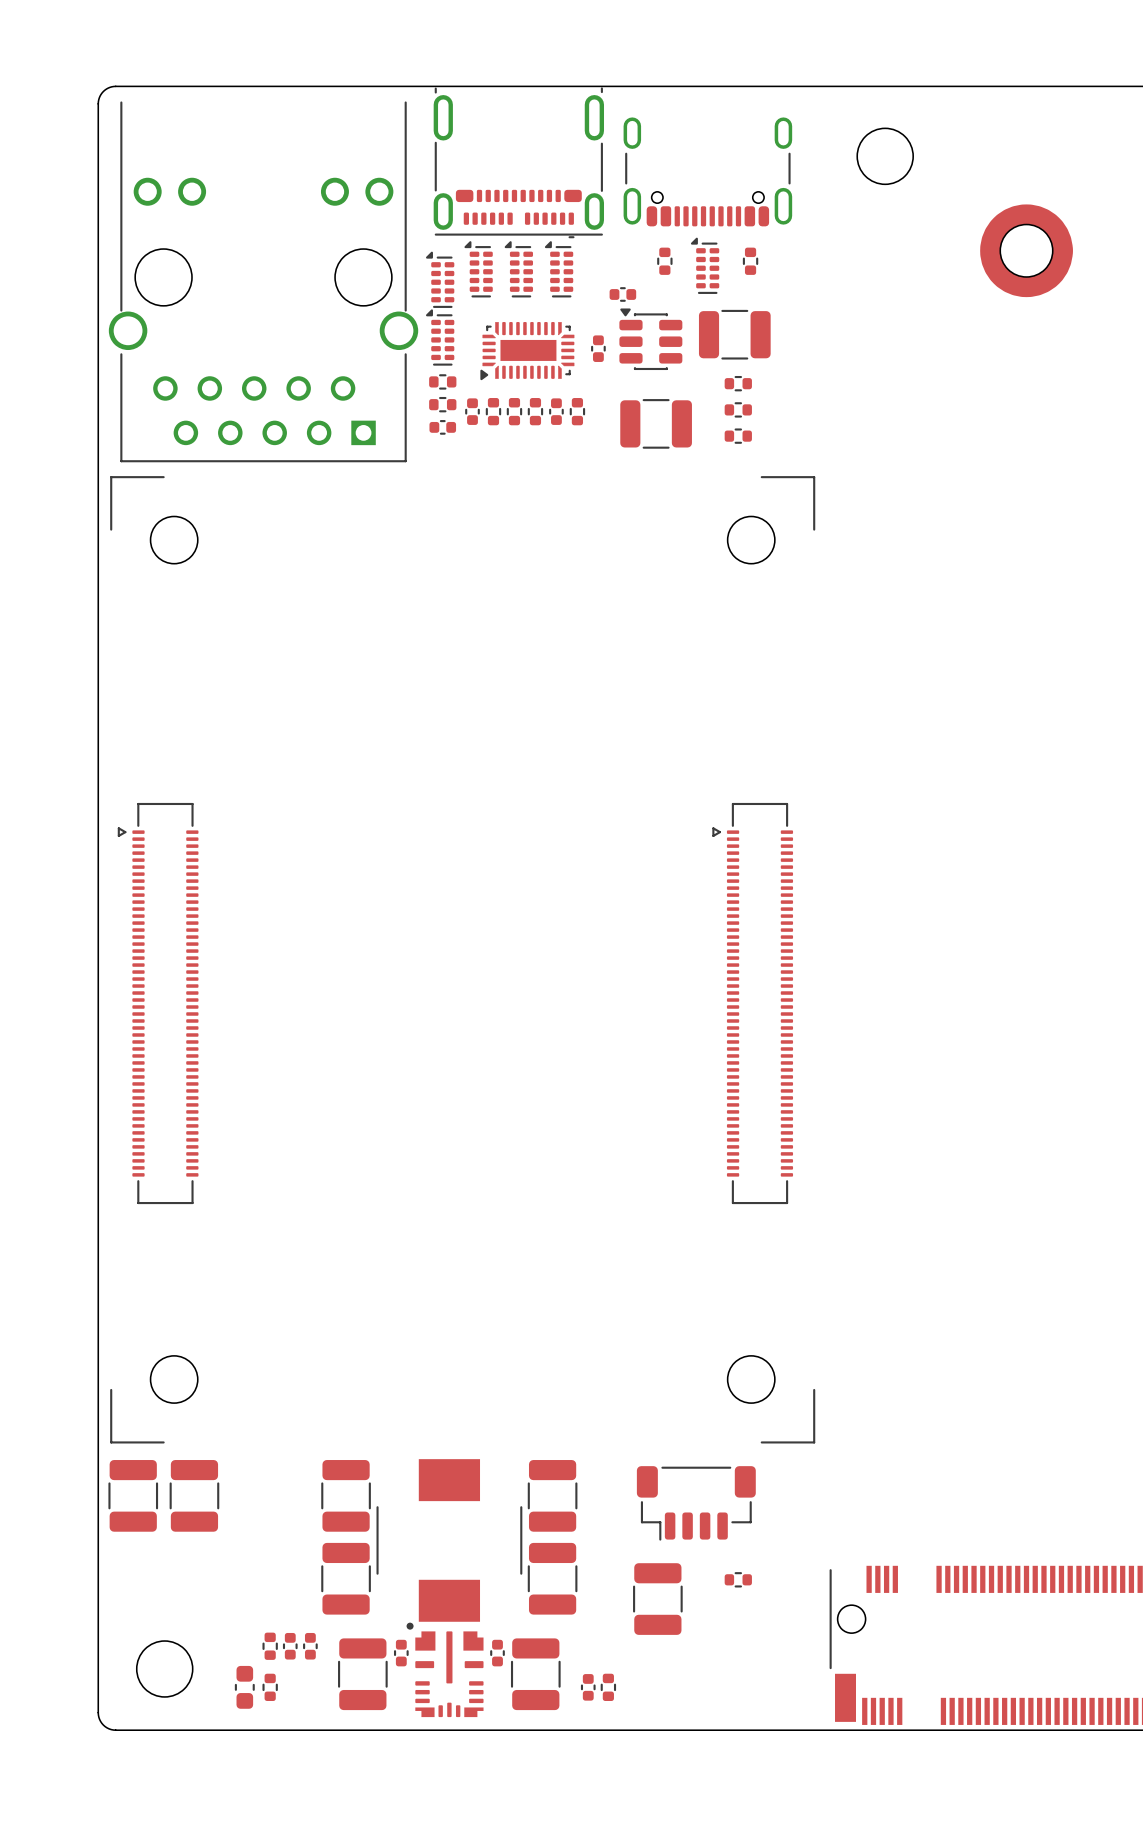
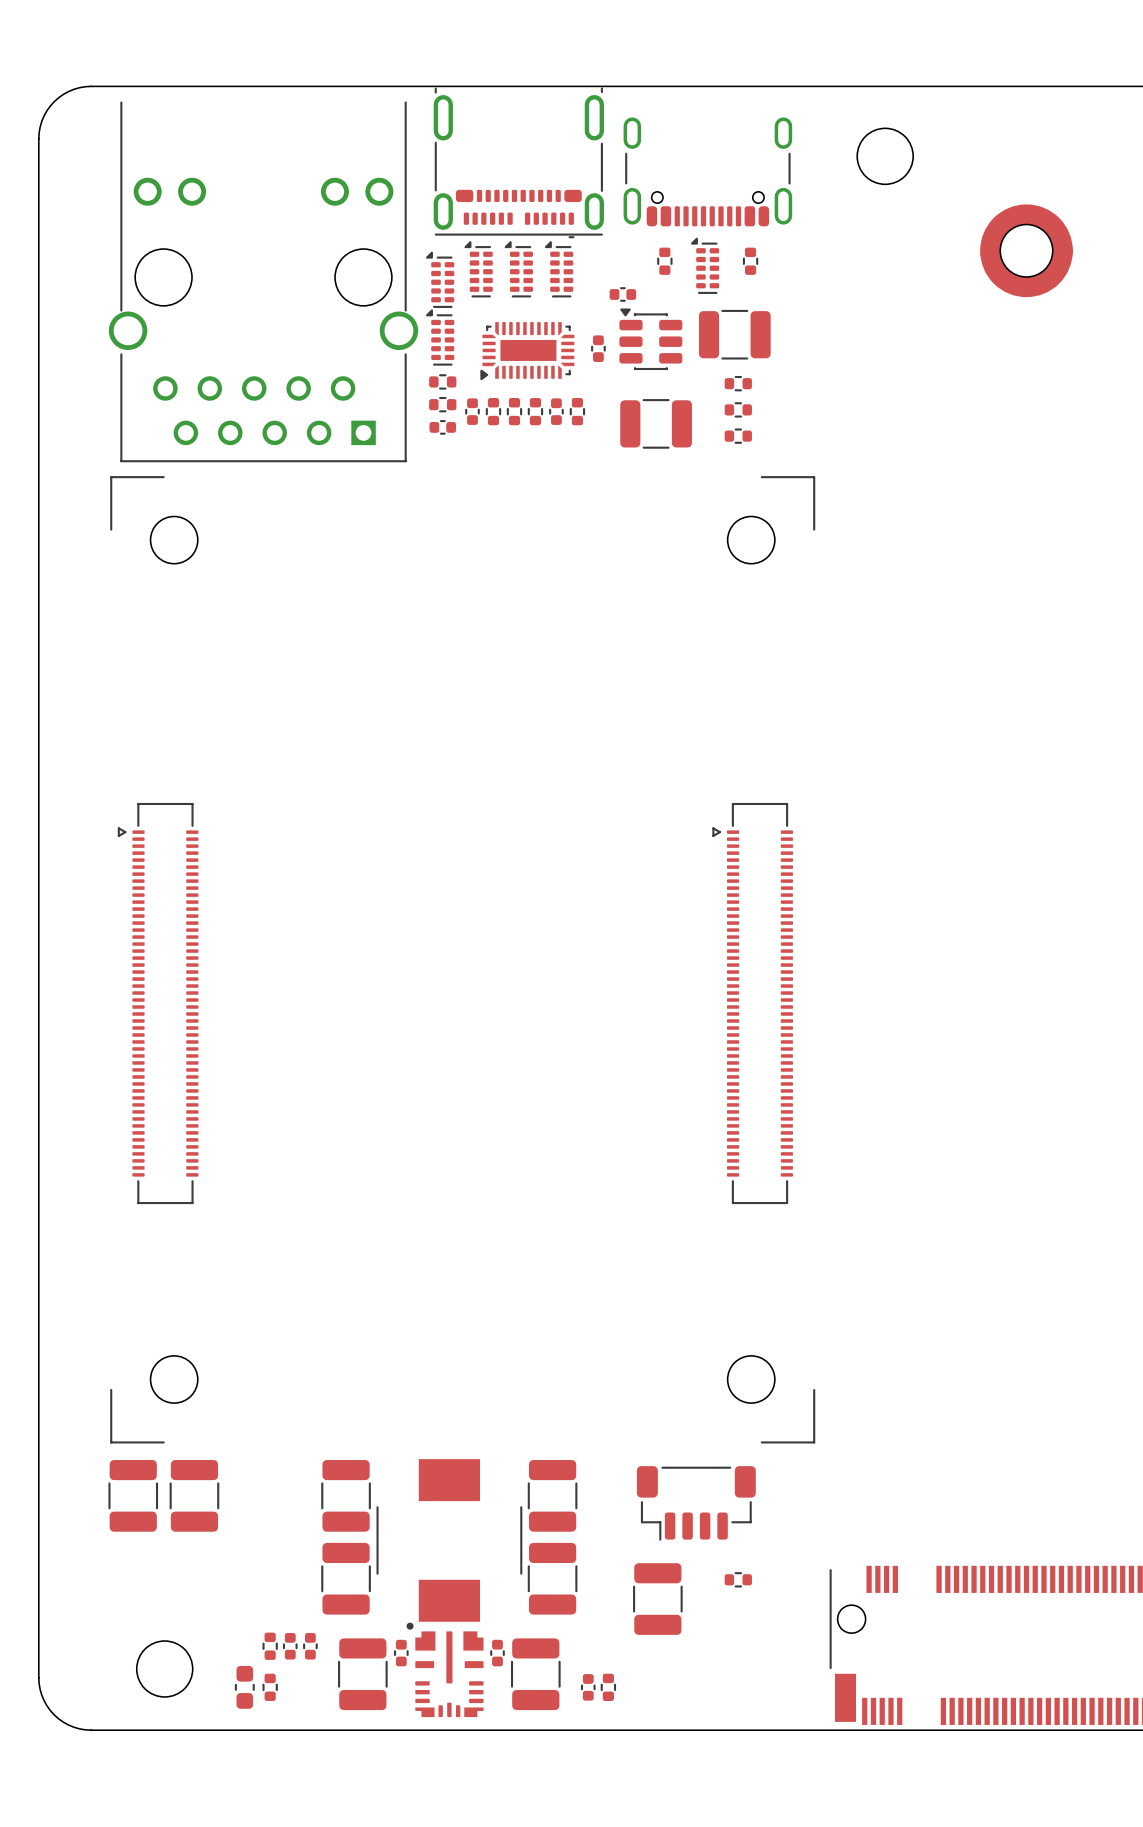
board edge: (115, 86) (103, 91) (98, 103) (98, 1712) (103, 1725) (115, 1730) -> (115, 86) (85, 86) (63, 94) (46, 110) (41, 121) (38, 138) (38, 1677) (41, 1695) (46, 1705) (63, 1722) (85, 1729) (115, 1730)

